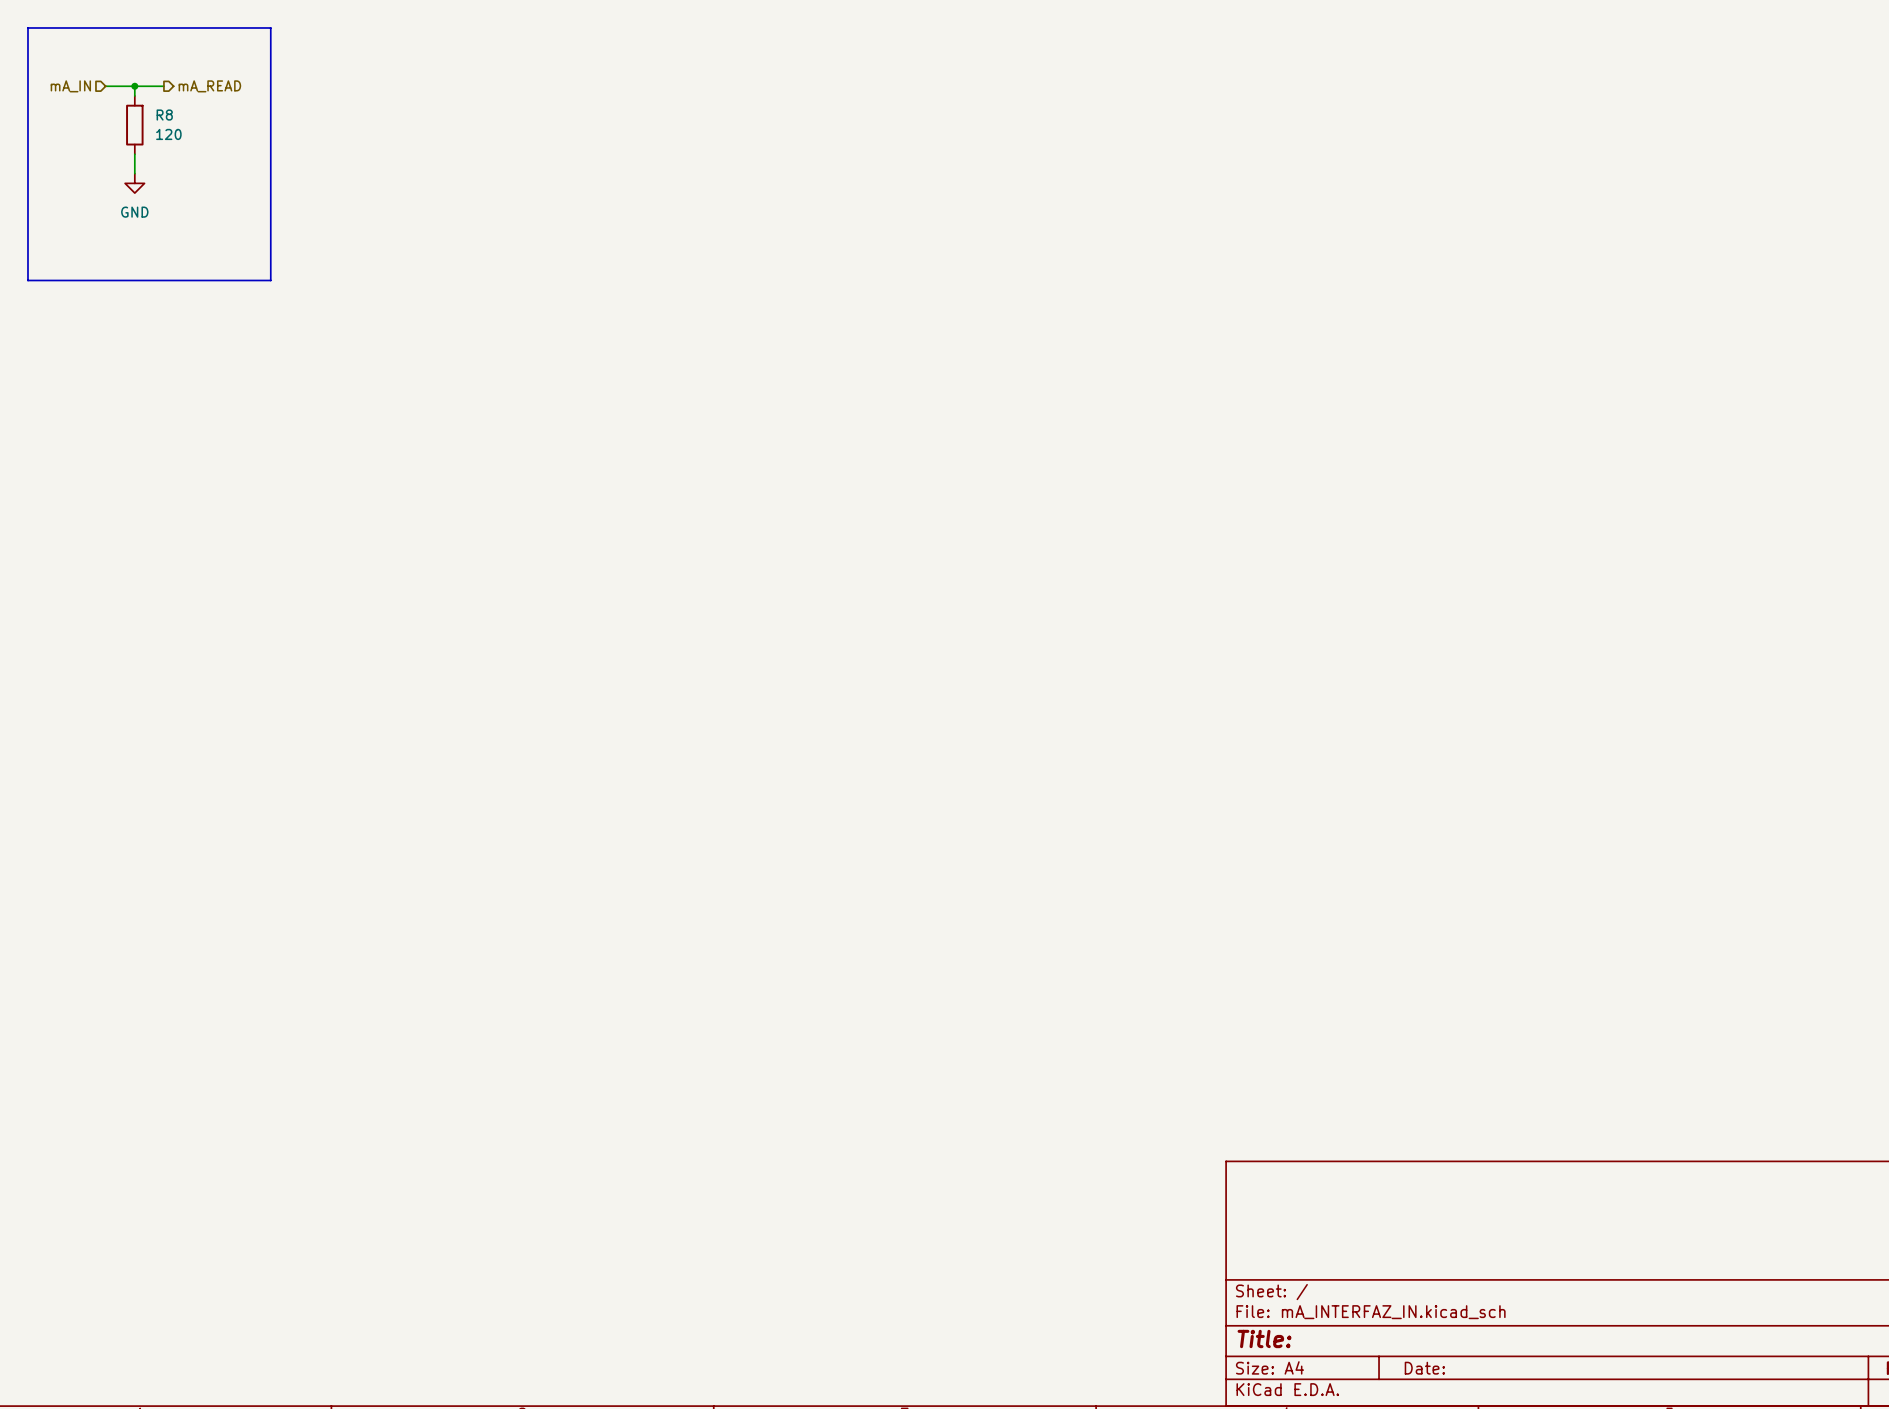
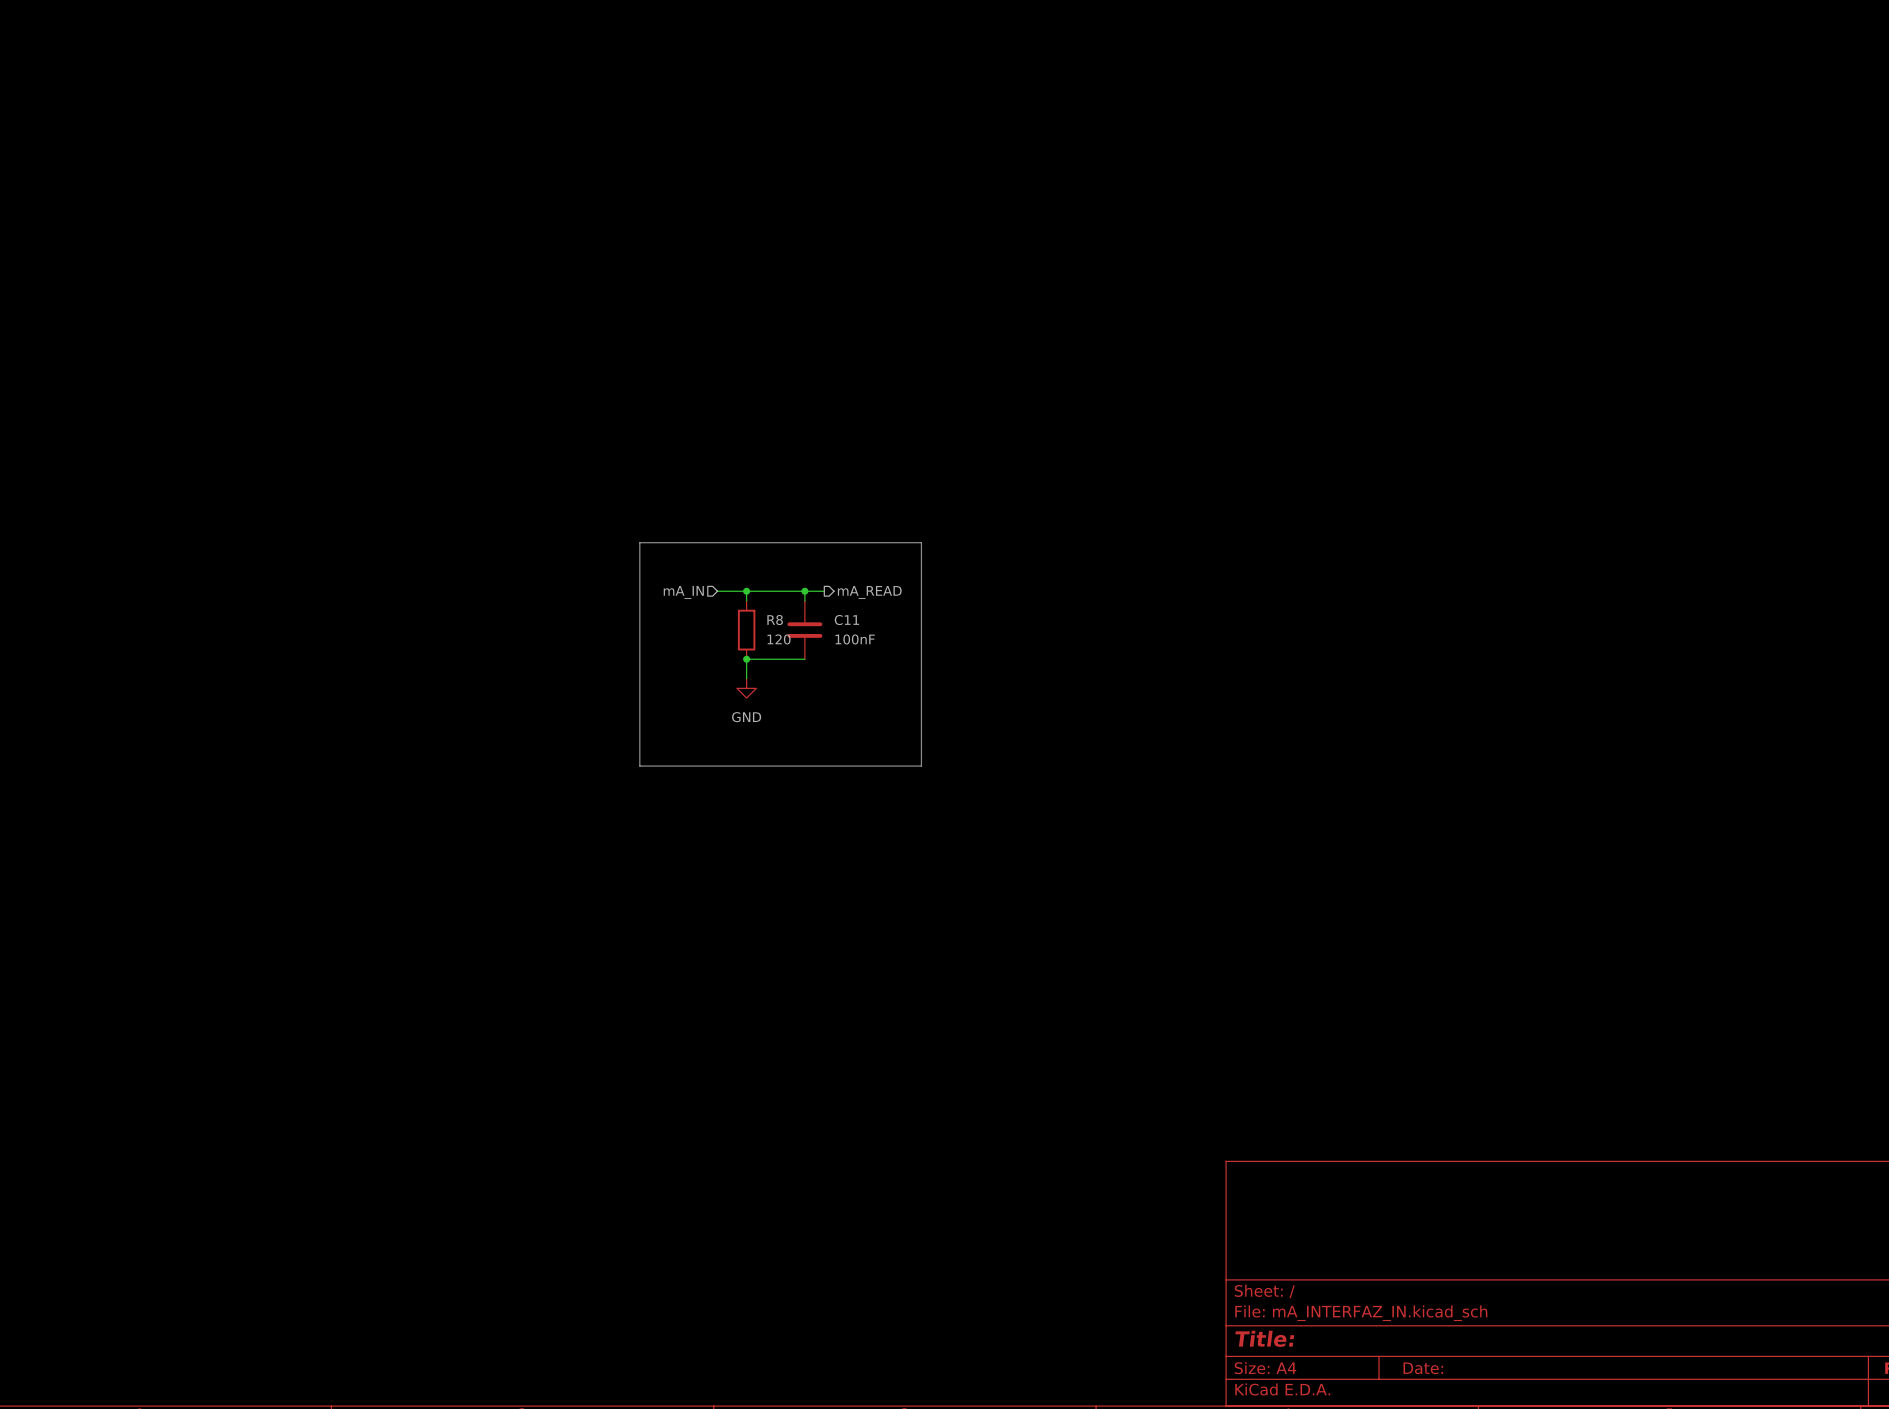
line: (27, 27) (270, 27) (270, 280) (27, 280) (27, 27) -> none
hierarchical label: mA_IN (70, 86) -> none
wire: (105, 86) (163, 86) -> none
wire: (134, 86) (134, 95) -> none
junction: (134, 86) -> none
hierarchical label: mA_READ (209, 86) -> none
R8 position: (134, 125) -> (746, 630)
wire: (134, 154) (134, 173) -> none
power symbol: GND (134, 183) -> none
line: none -> (639, 542) (921, 542) (921, 766) (639, 766) (639, 542)
hierarchical label: none -> mA_IN (683, 592)
wire: none -> (717, 591) (824, 591)
wire: none -> (746, 591) (746, 600)
junction: none -> (746, 591)
wire: none -> (804, 591) (804, 600)
junction: none -> (804, 591)
hierarchical label: none -> mA_READ (869, 592)
C11: none -> 100nF (804, 630)
junction: none -> (746, 659)
wire: none -> (804, 659) (746, 659) (746, 678)
power symbol: none -> GND (746, 688)

